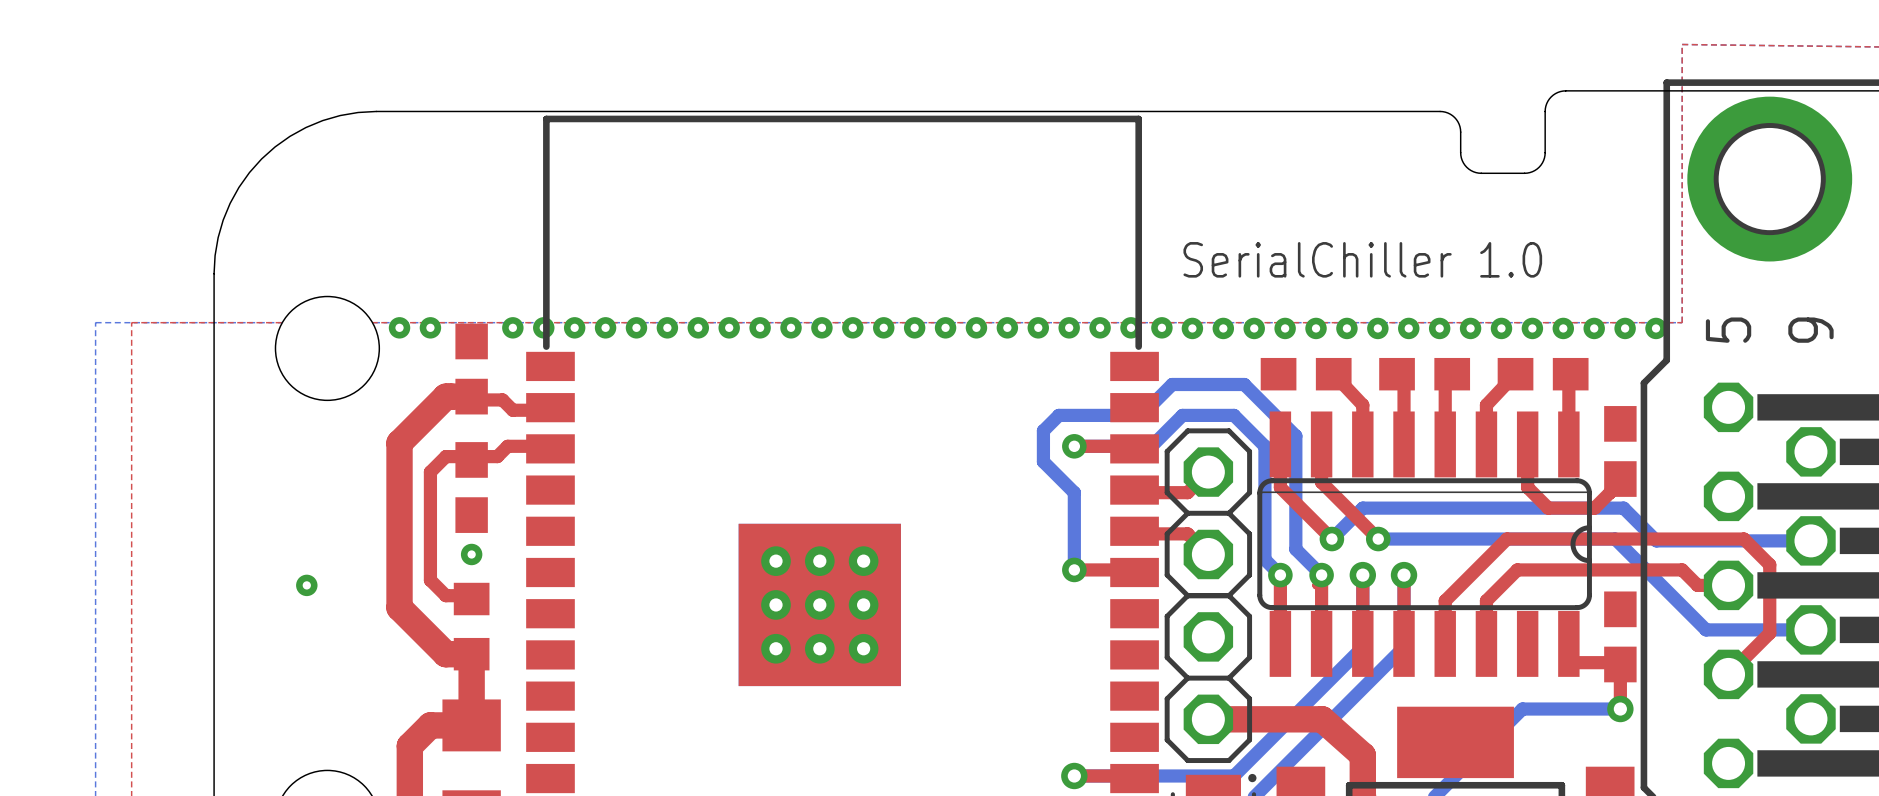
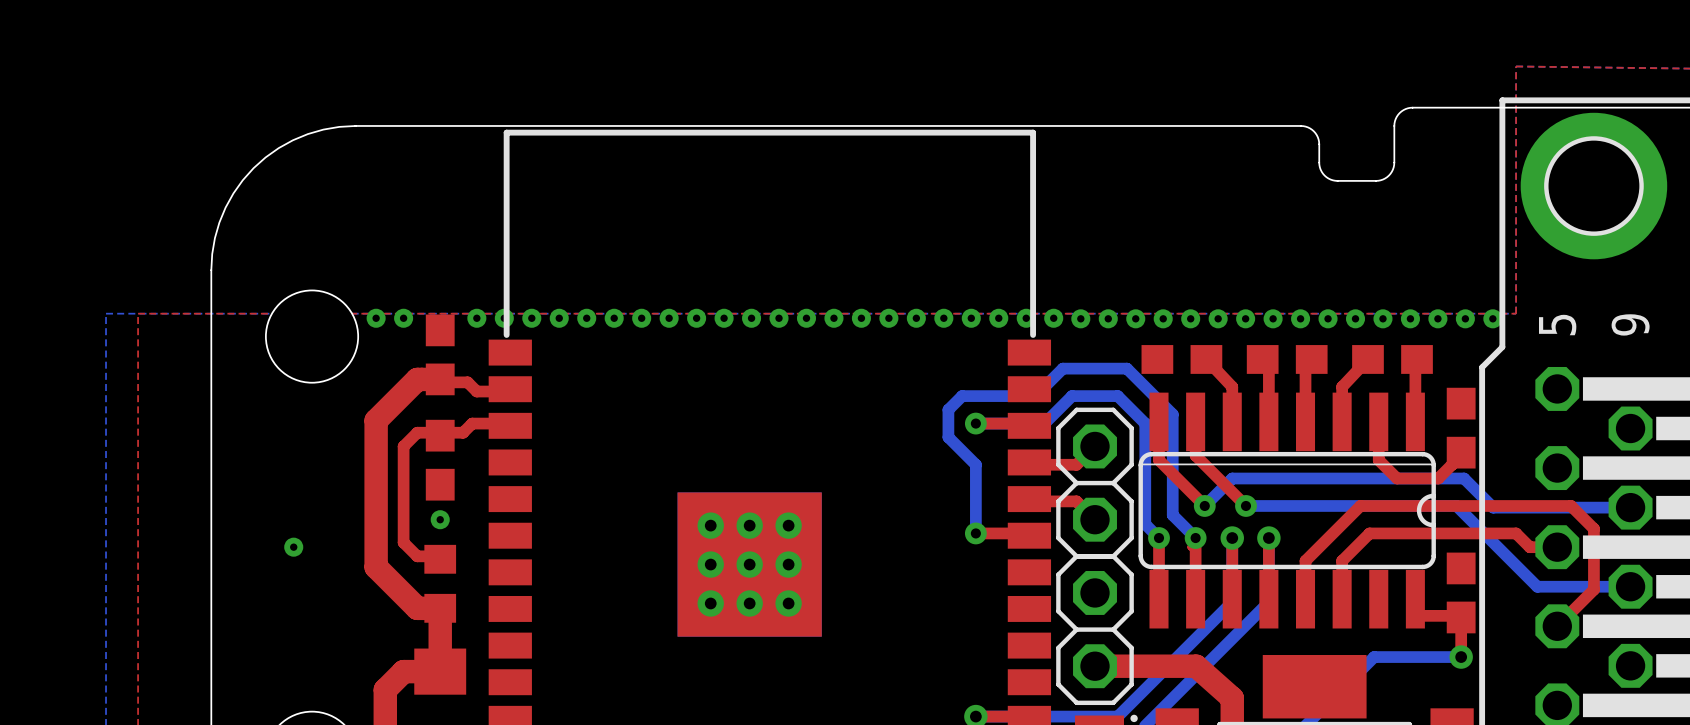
text: SerialChiller 1.0 (1362, 259) -> none

